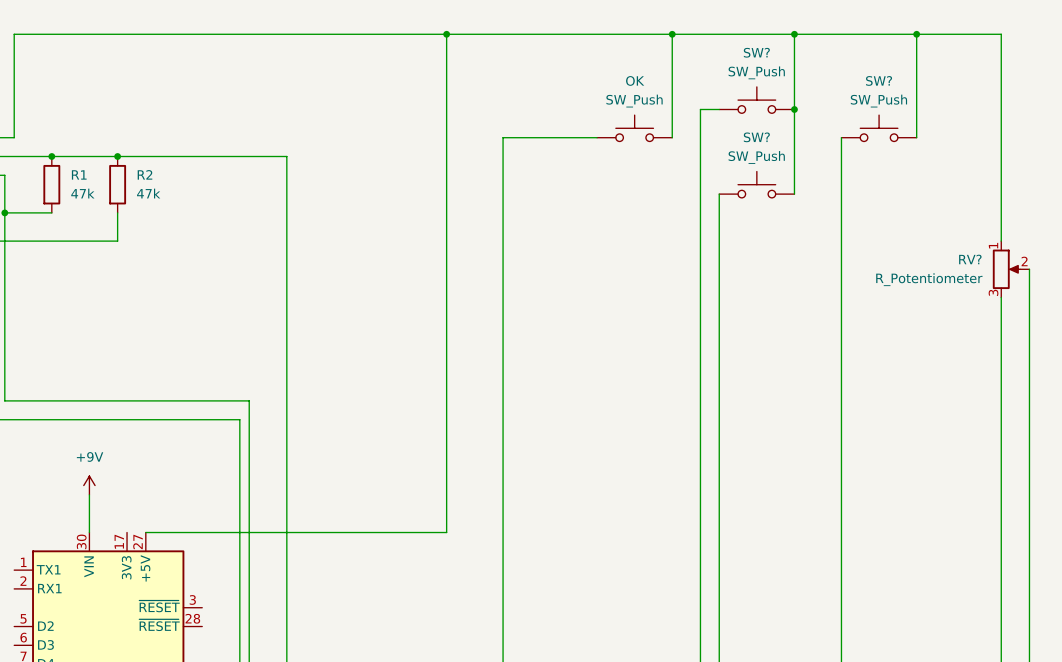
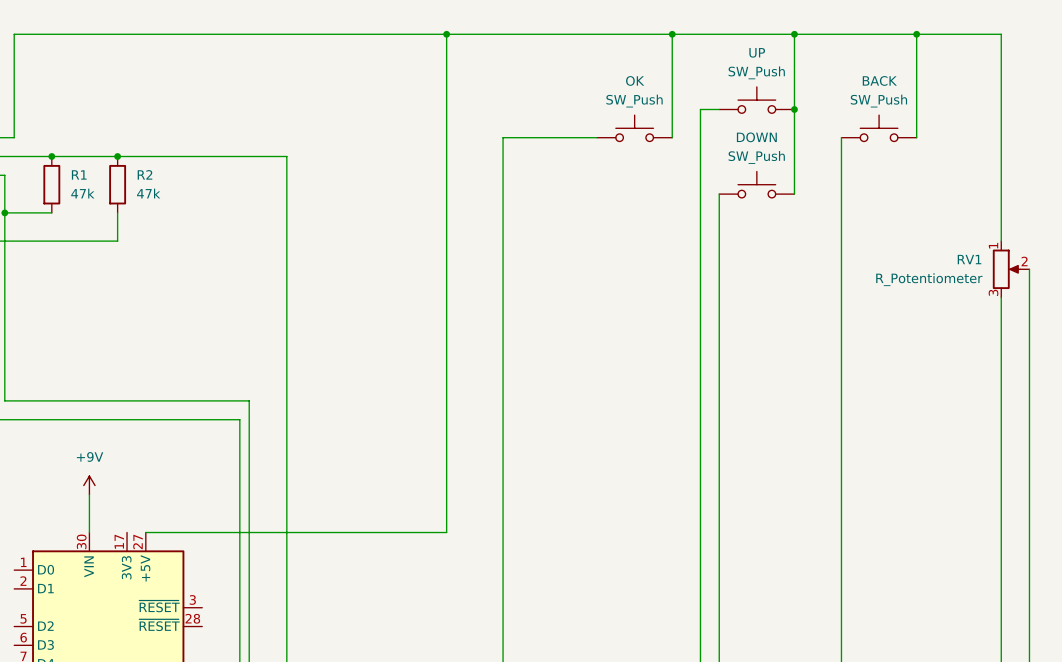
SW? name: SW? (756, 52) -> UP (757, 52)
SW? name: SW? (879, 80) -> BACK (879, 80)
SW? name: SW? (756, 137) -> DOWN (756, 137)
RV? name: RV? (970, 259) -> RV1 (969, 259)
part pin name: TX1 (48, 569) -> D0 (46, 569)
part pin name: RX1 (49, 588) -> D1 (45, 588)

